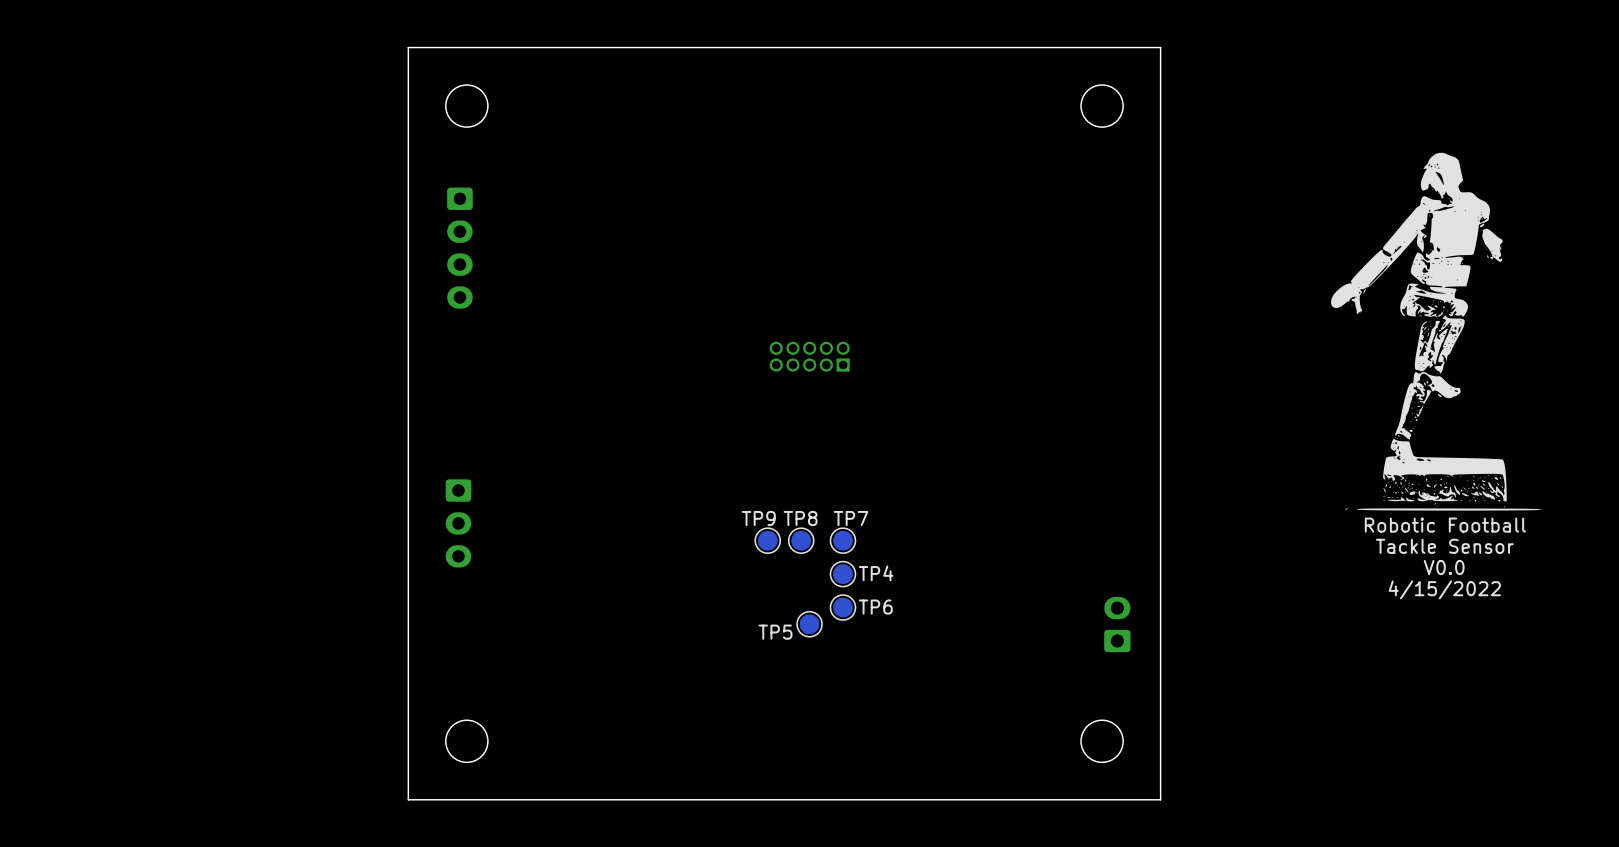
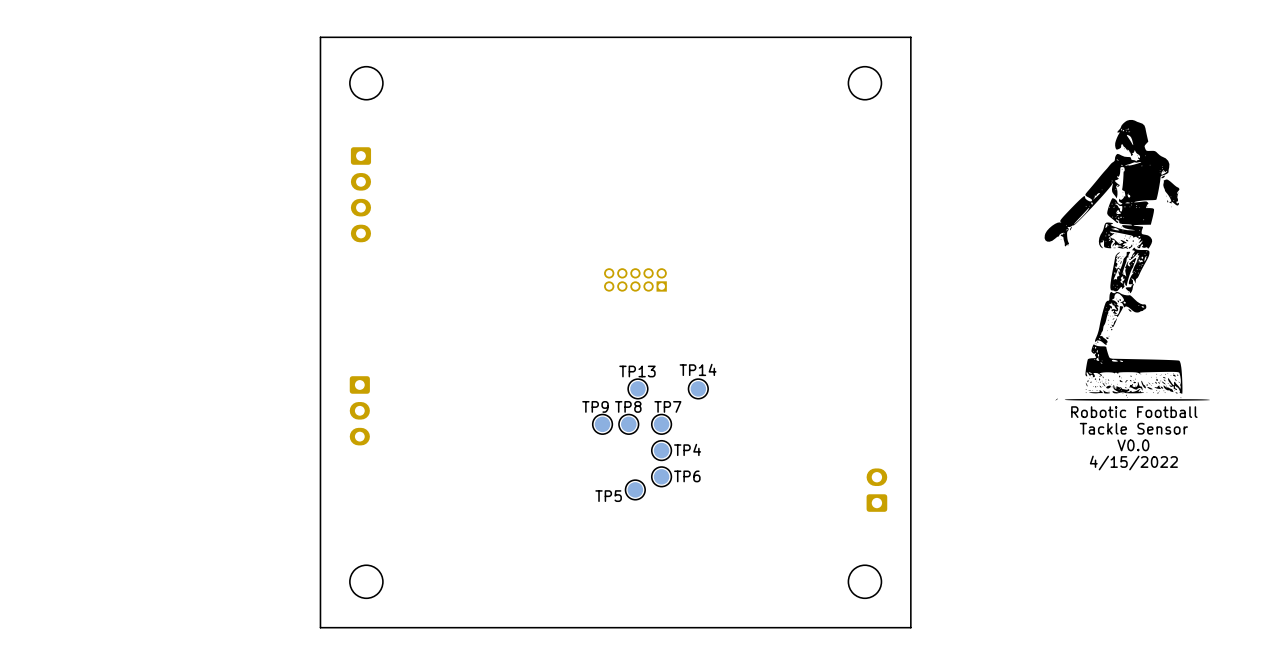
TP13: none -> (637, 388)
TP14: none -> (698, 388)

